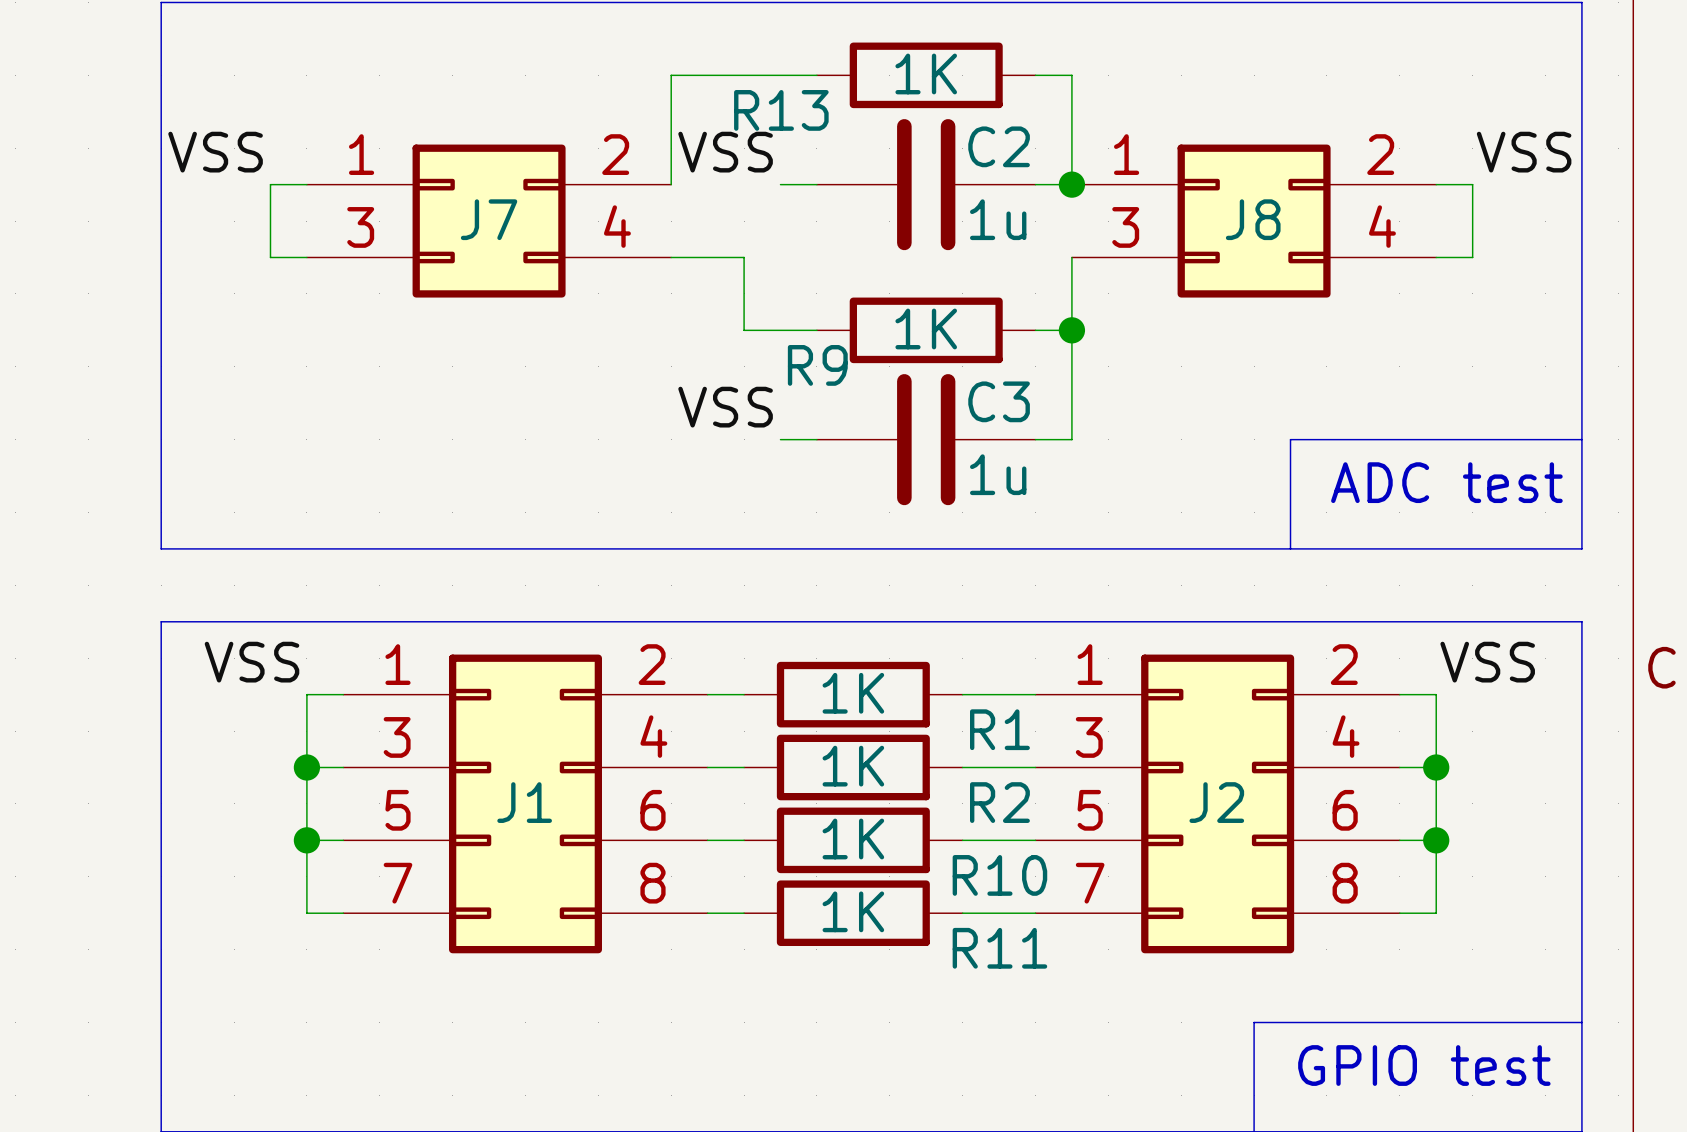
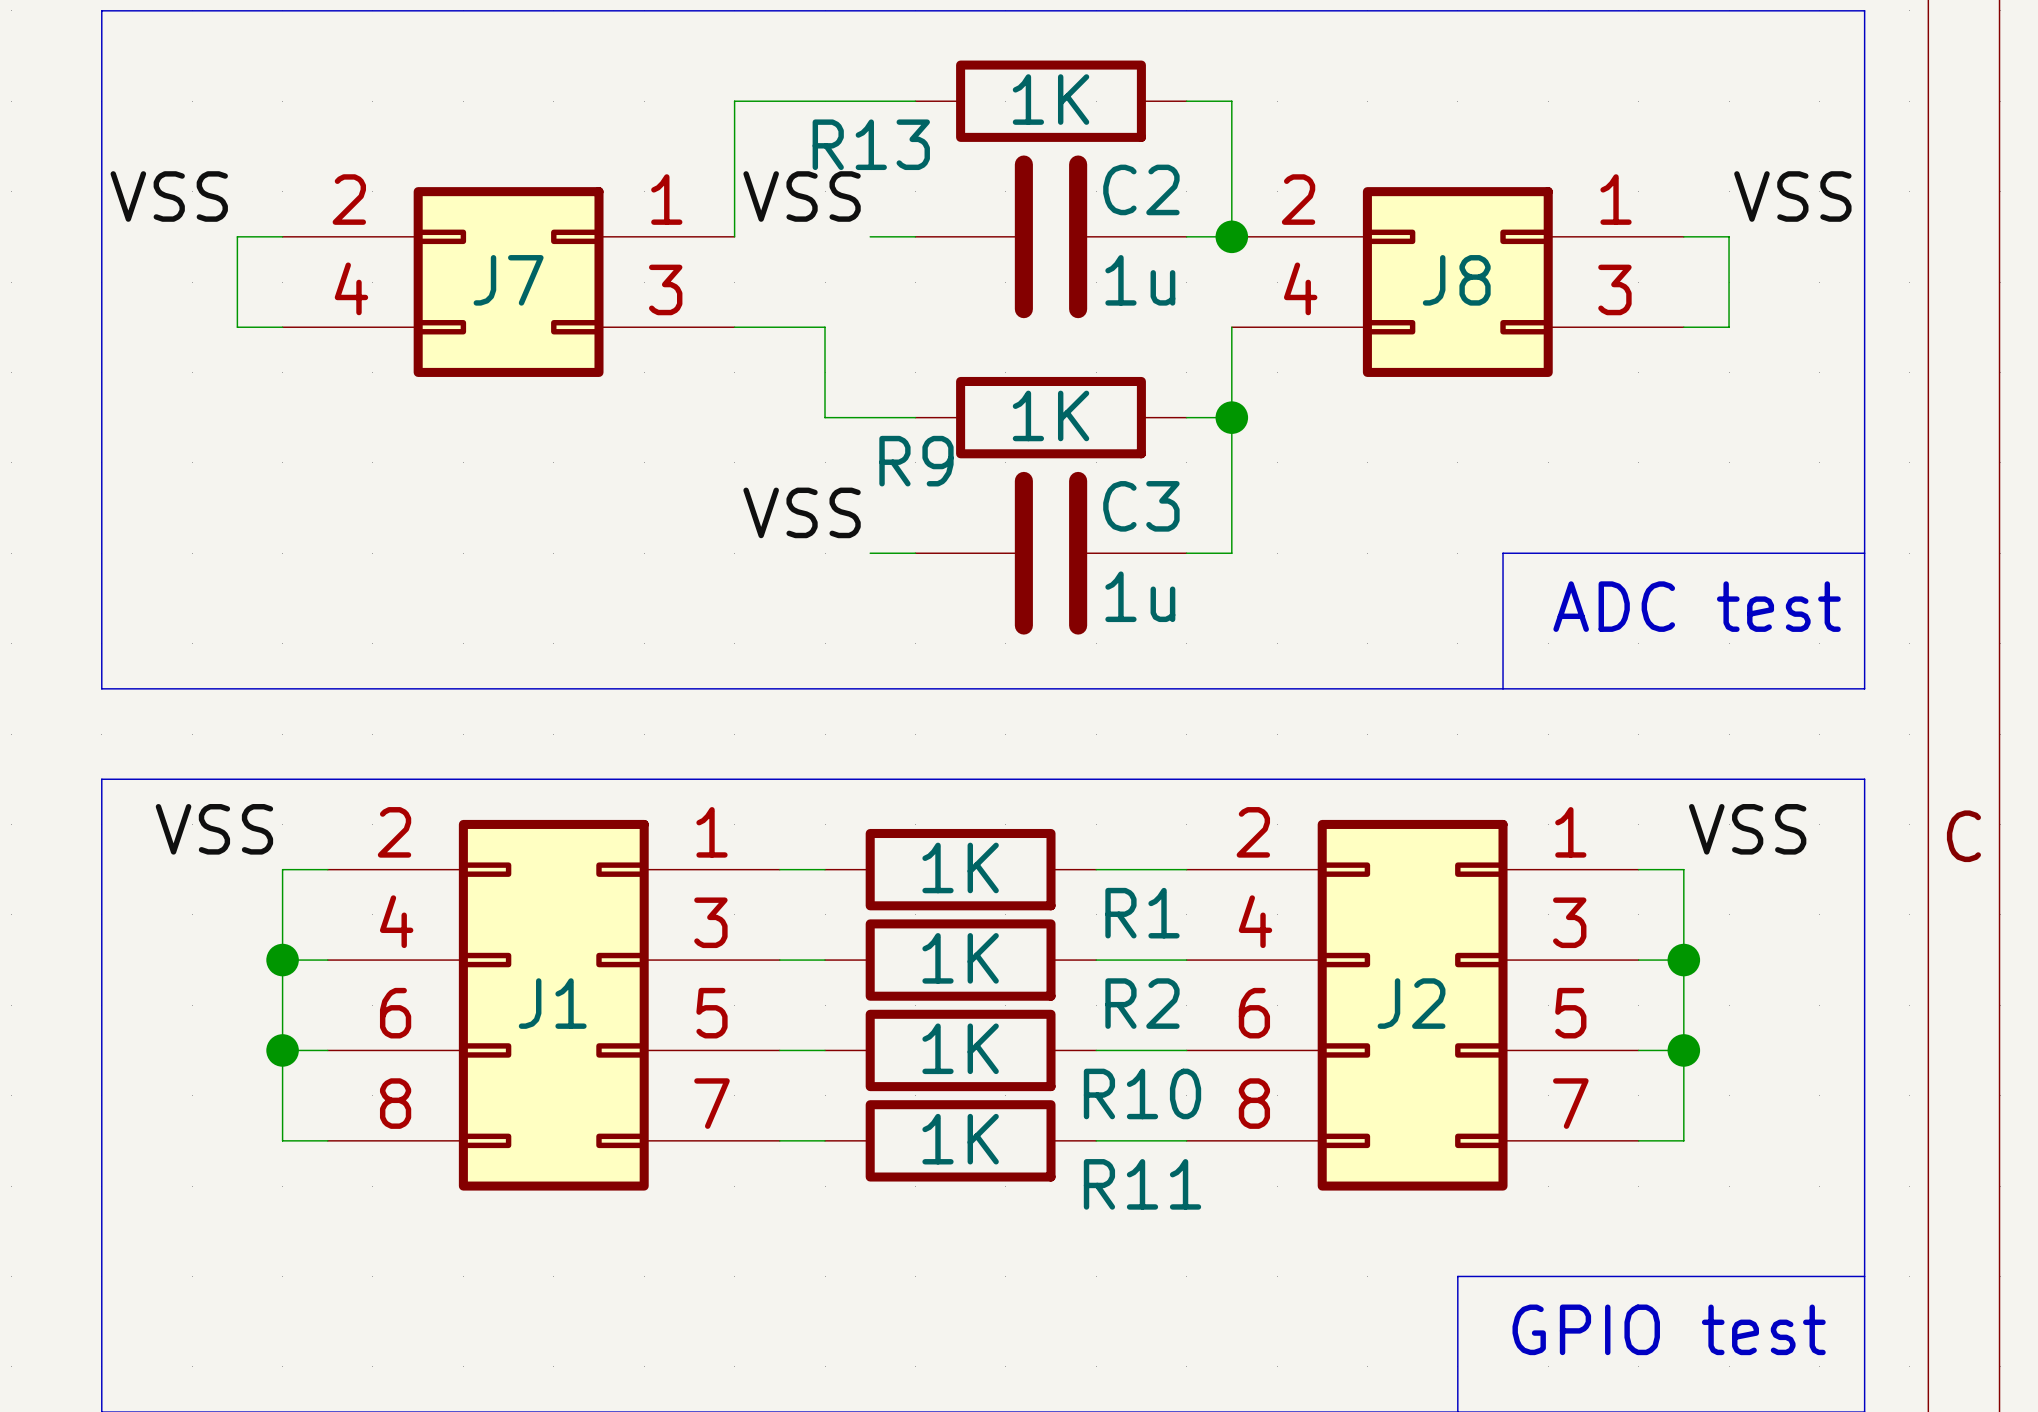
J7 flip: as is (489, 221) -> left-right (508, 282)
J8 flip: as is (1254, 221) -> left-right (1457, 282)
J1 flip: as is (525, 803) -> left-right (553, 1005)
J2 flip: as is (1217, 803) -> left-right (1412, 1005)

